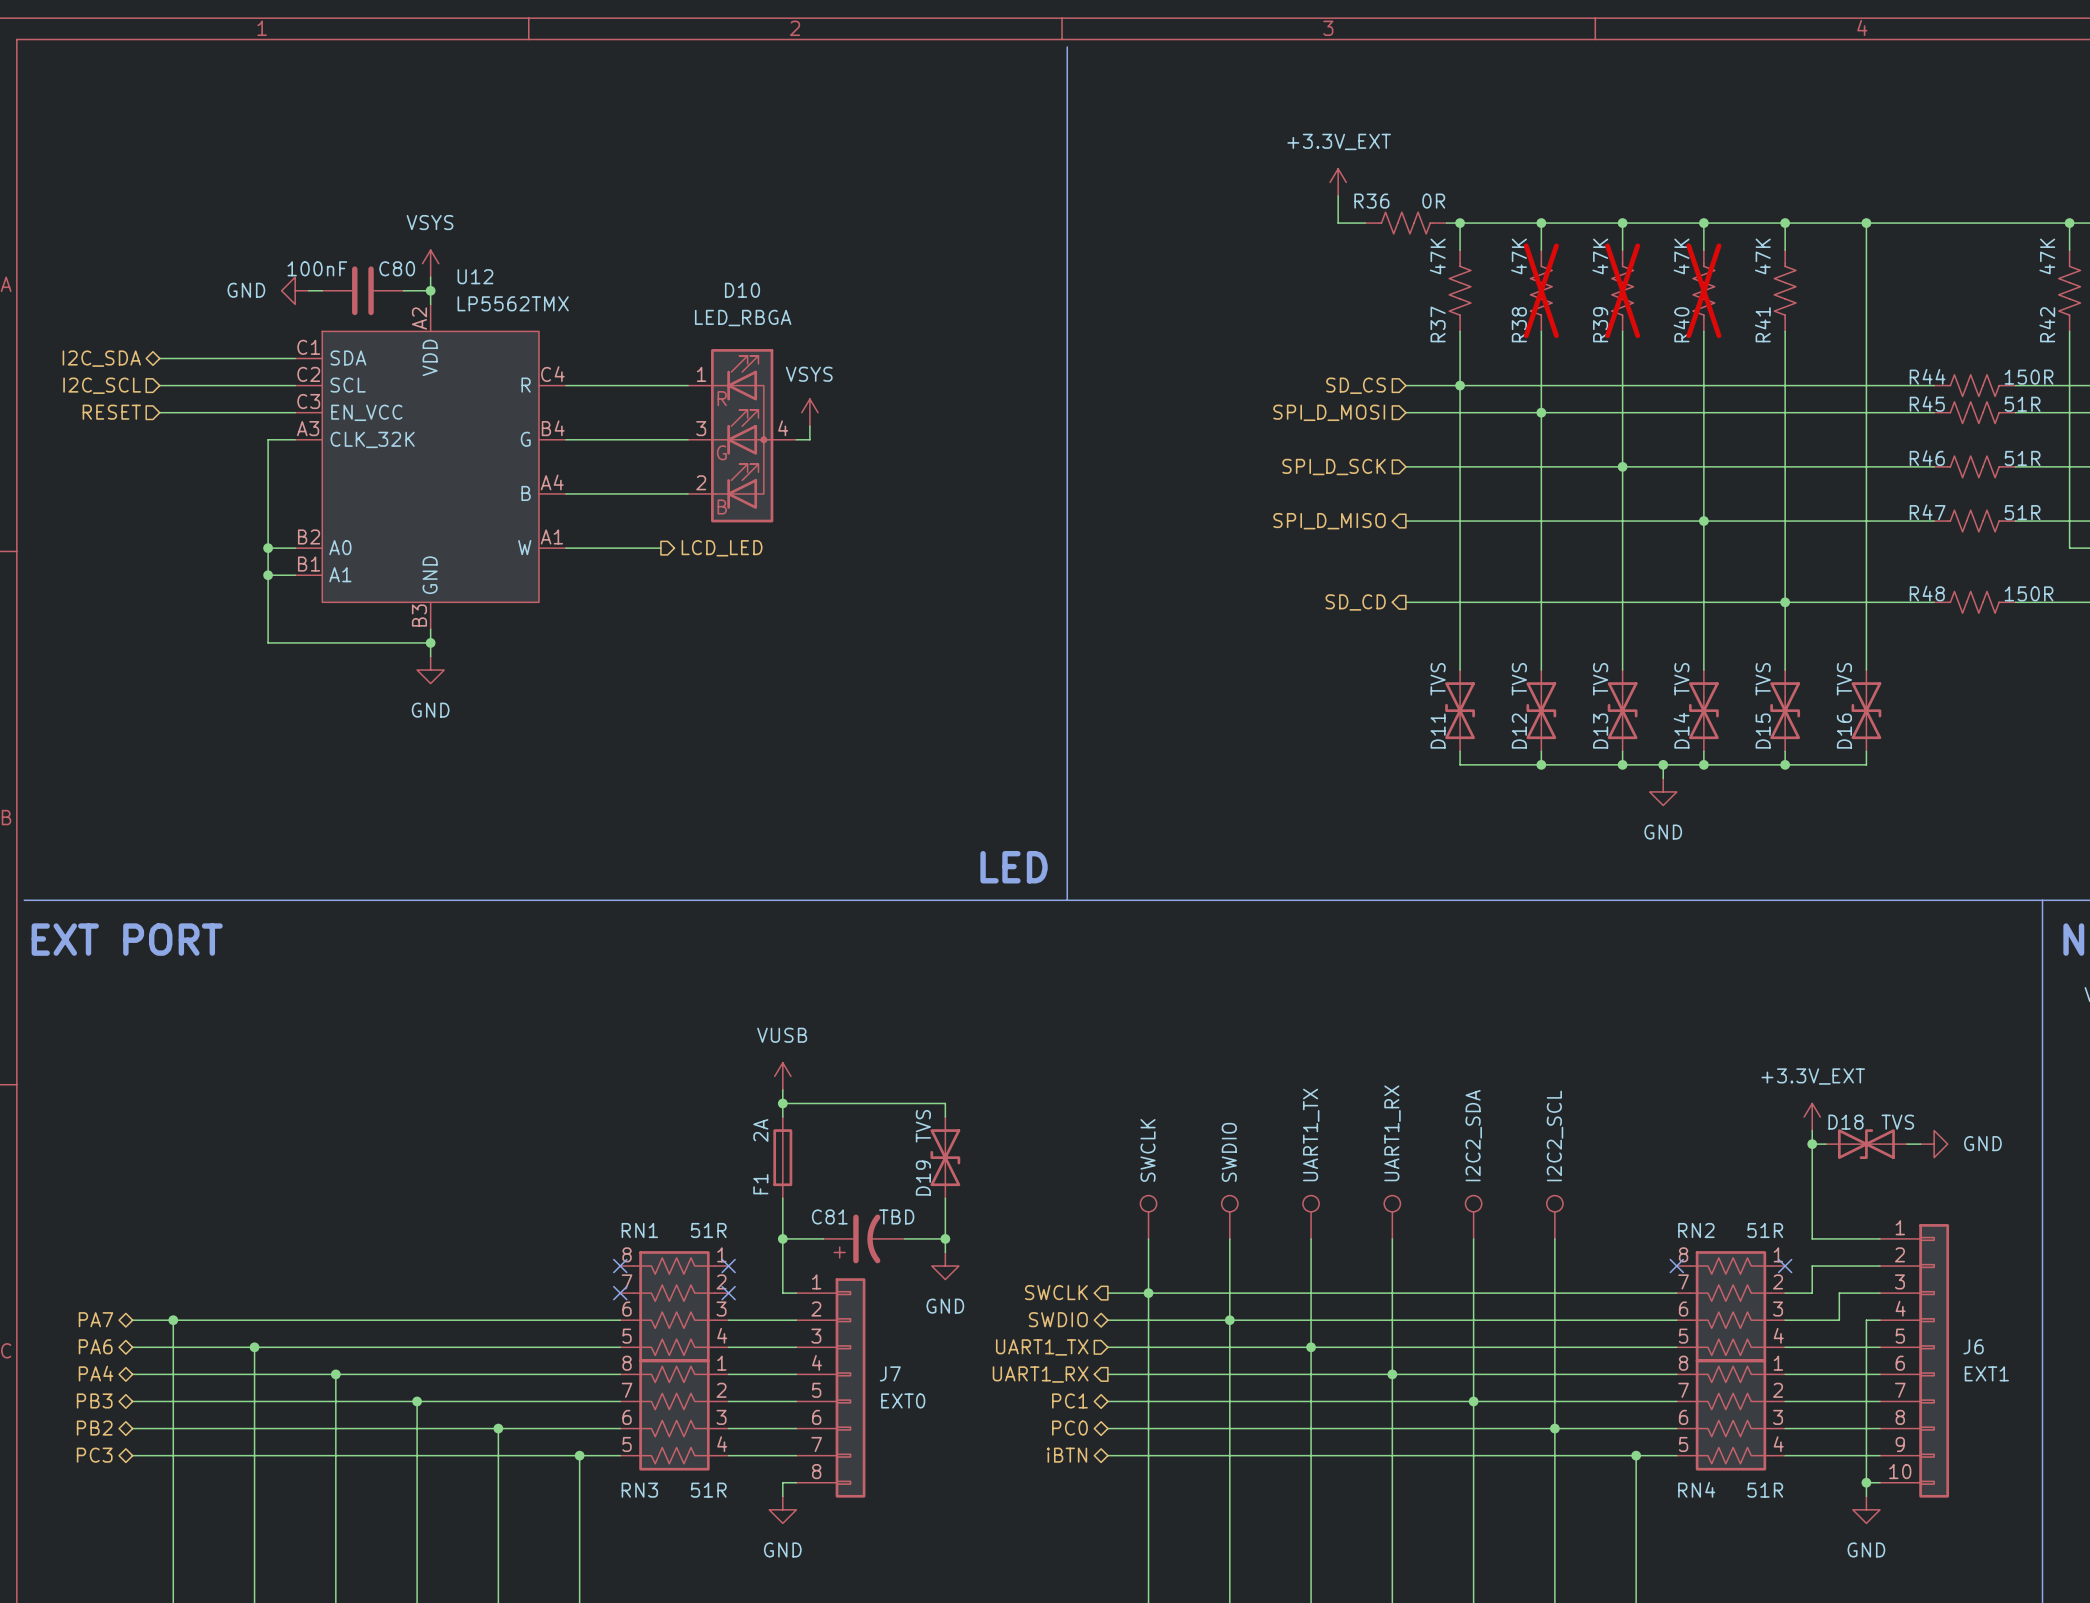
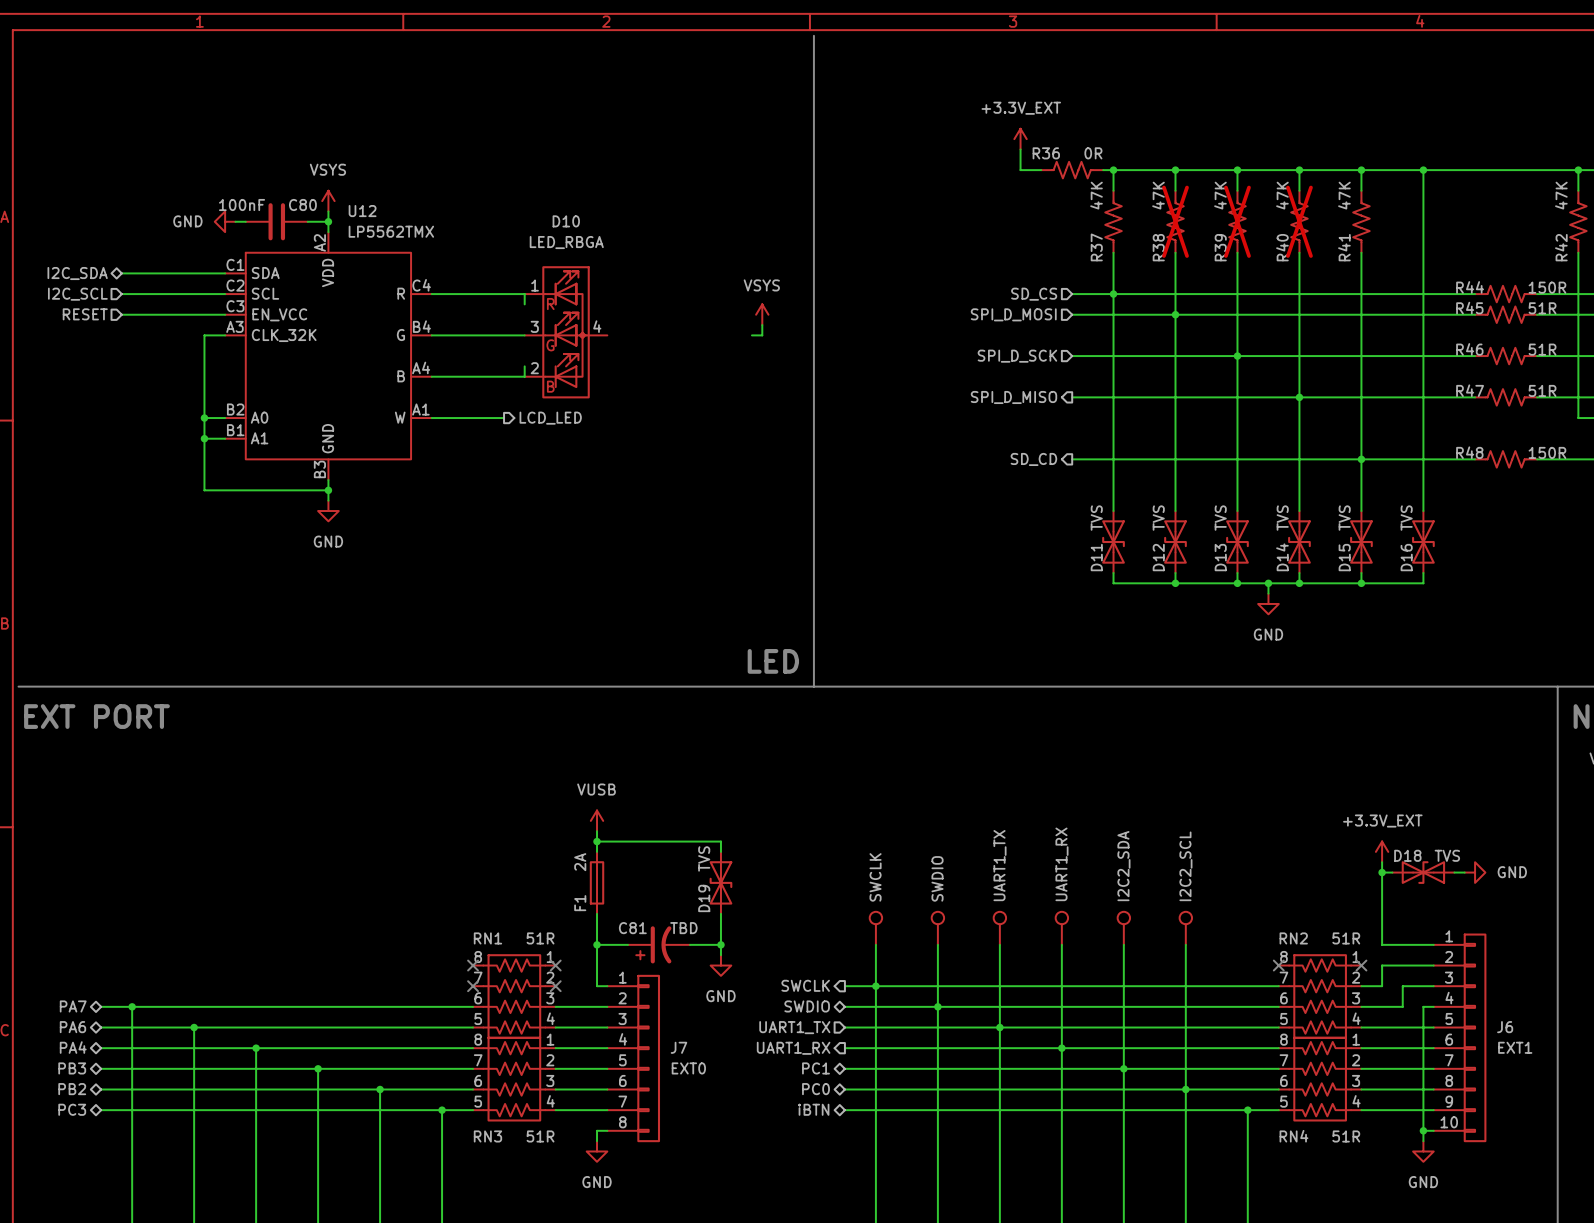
wire: none -> (524, 294) (524, 304)
power symbol position: VSYS (809, 412) -> VSYS (762, 314)
wire: (809, 426) (809, 439) (796, 439) -> (762, 325) (762, 335) (751, 335)
wire: none -> (524, 366) (524, 376)

